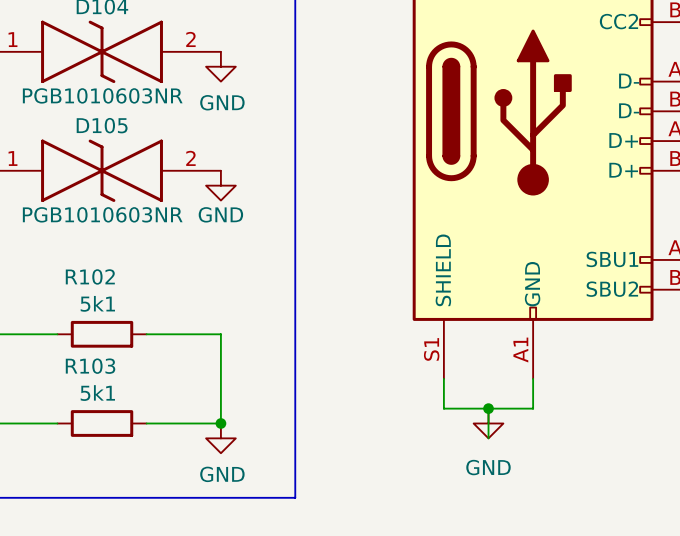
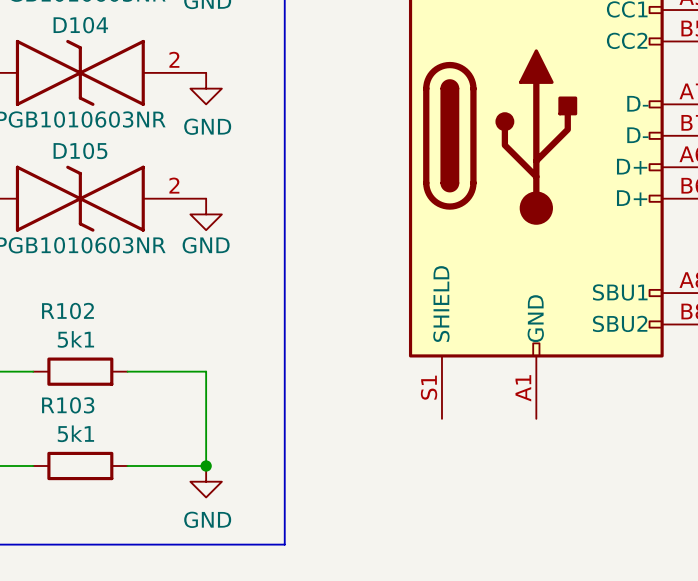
wire: (443, 378) (443, 408) (533, 408) (533, 378) -> none
wire: (488, 408) (488, 438) -> none
junction: (488, 408) -> none
power symbol: GND (488, 423) -> none

